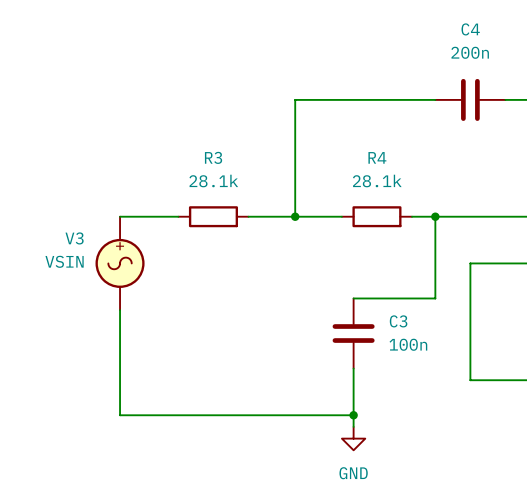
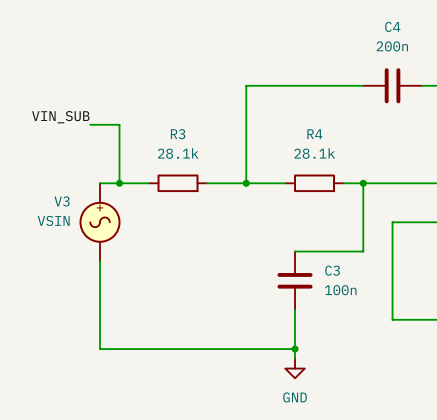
label: none -> VIN_SUB (60, 117)
wire: none -> (90, 124) (119, 124) (119, 183)
junction: none -> (119, 183)

